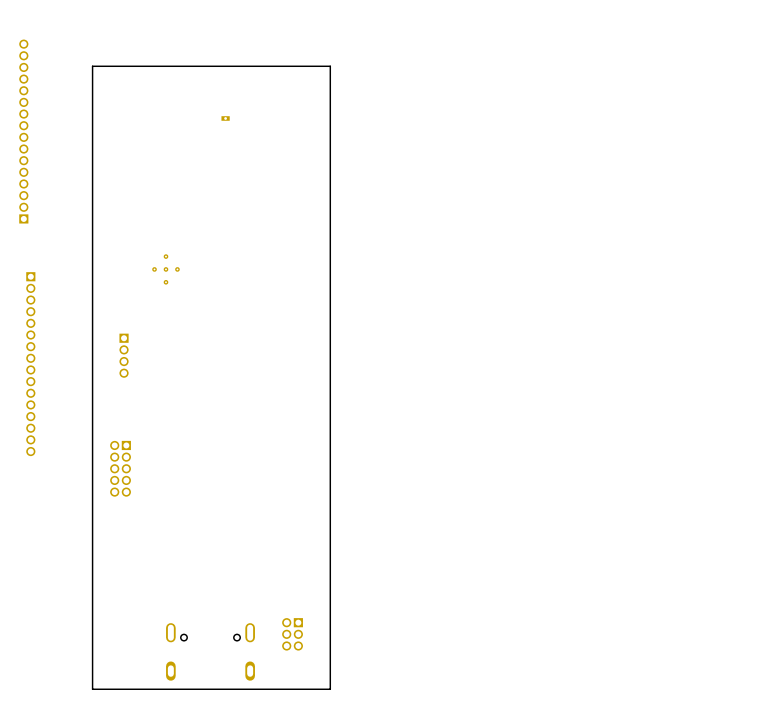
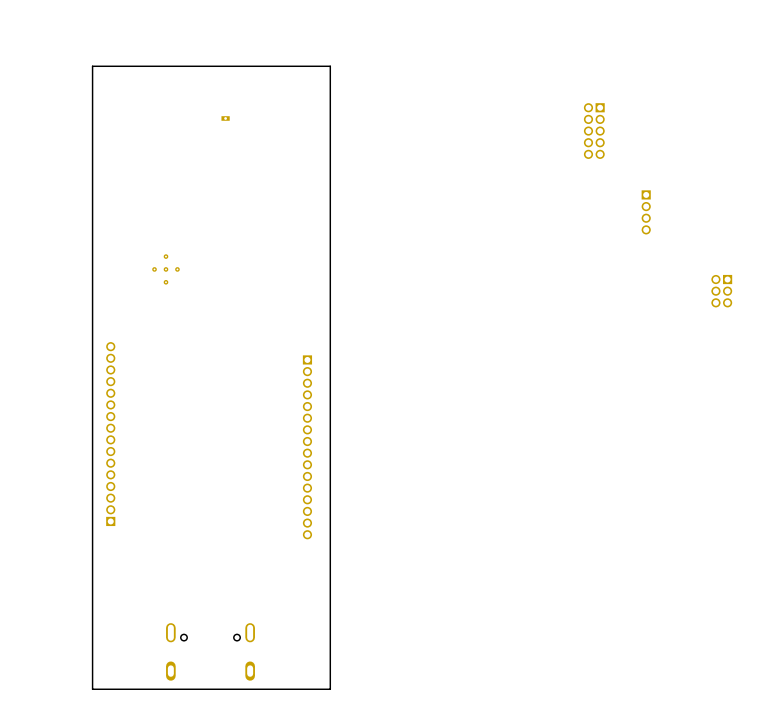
part: (23, 131) -> none
part: none -> (594, 131)
part: none -> (646, 212)
part: none -> (721, 291)
part: (124, 355) -> none
part rotation: 0° (30, 364) -> 180° (110, 434)
part: none -> (307, 447)
part: (120, 468) -> none
part: (292, 634) -> none

